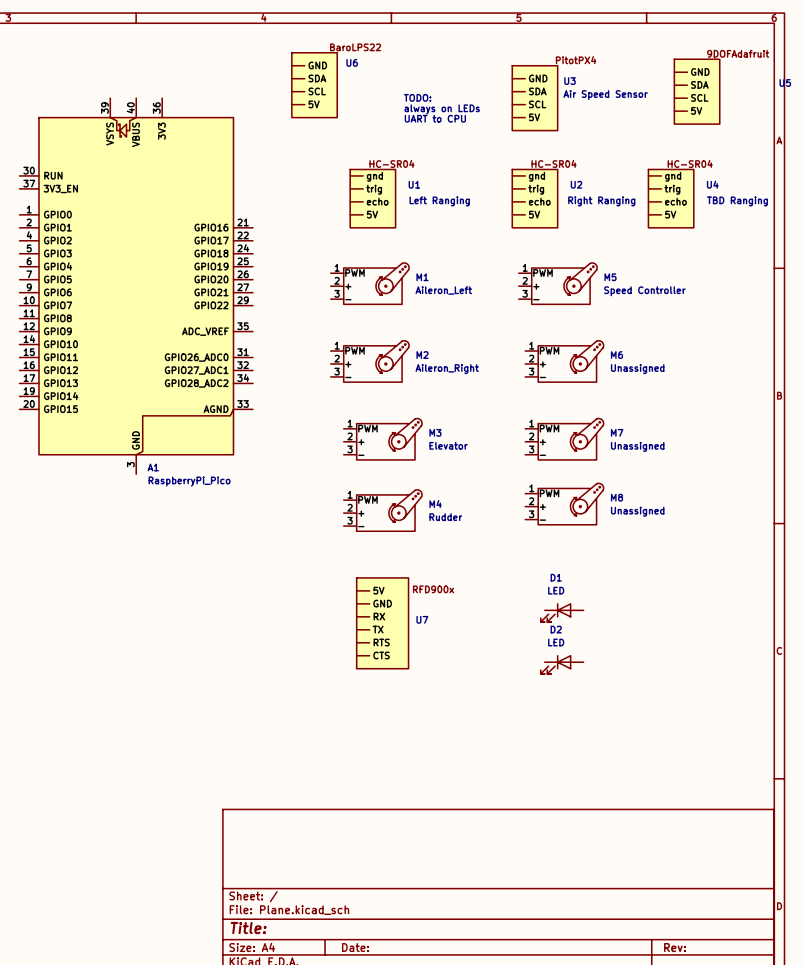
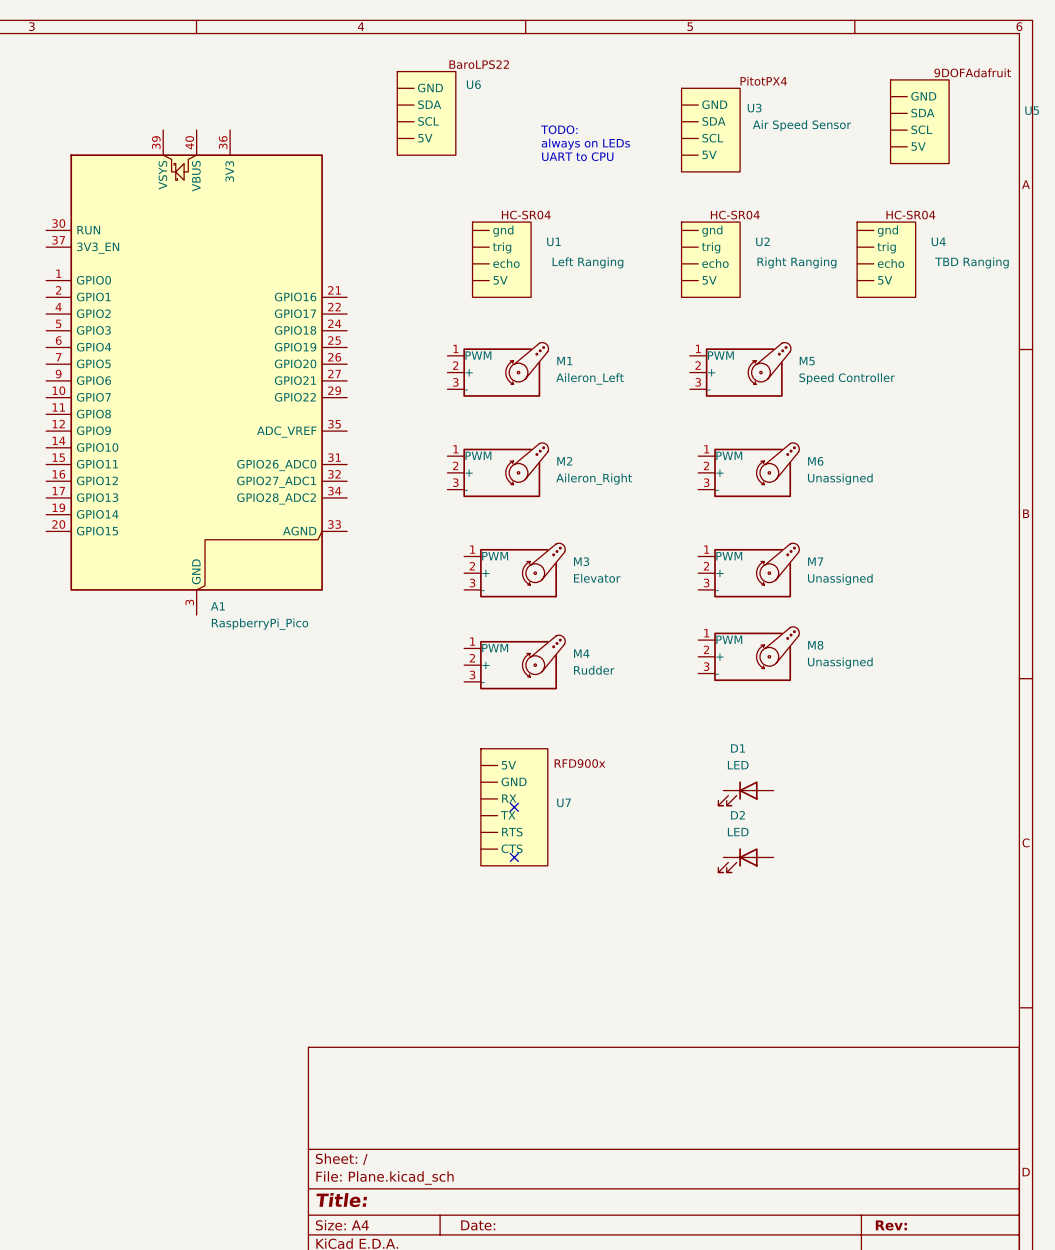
no-connect mark: none -> (514, 807)
no-connect mark: none -> (514, 857)

